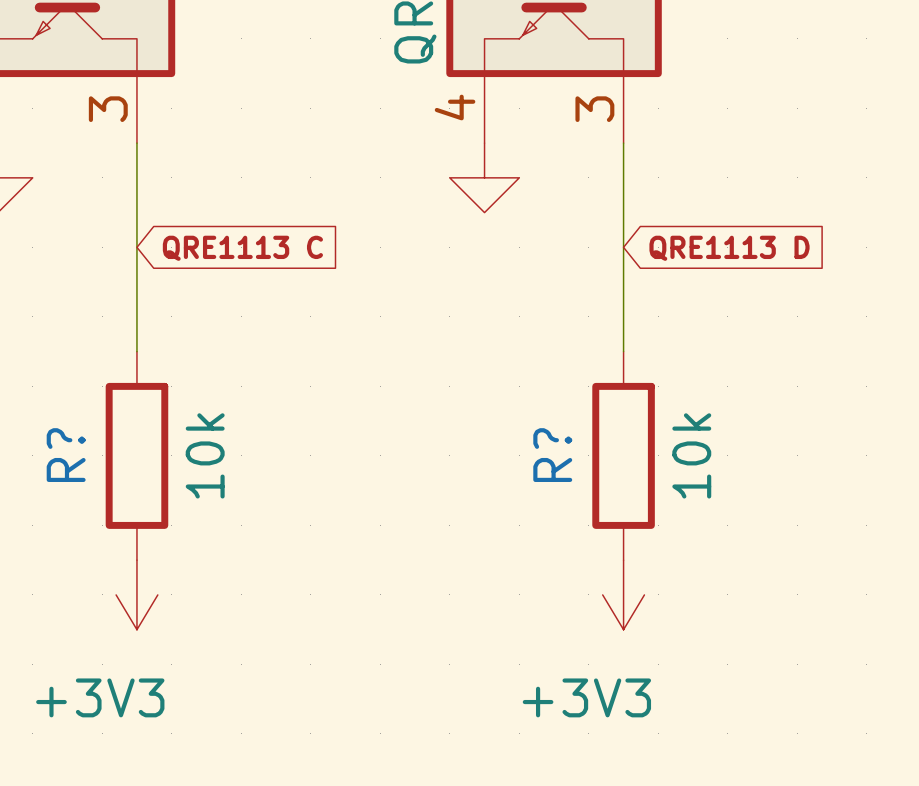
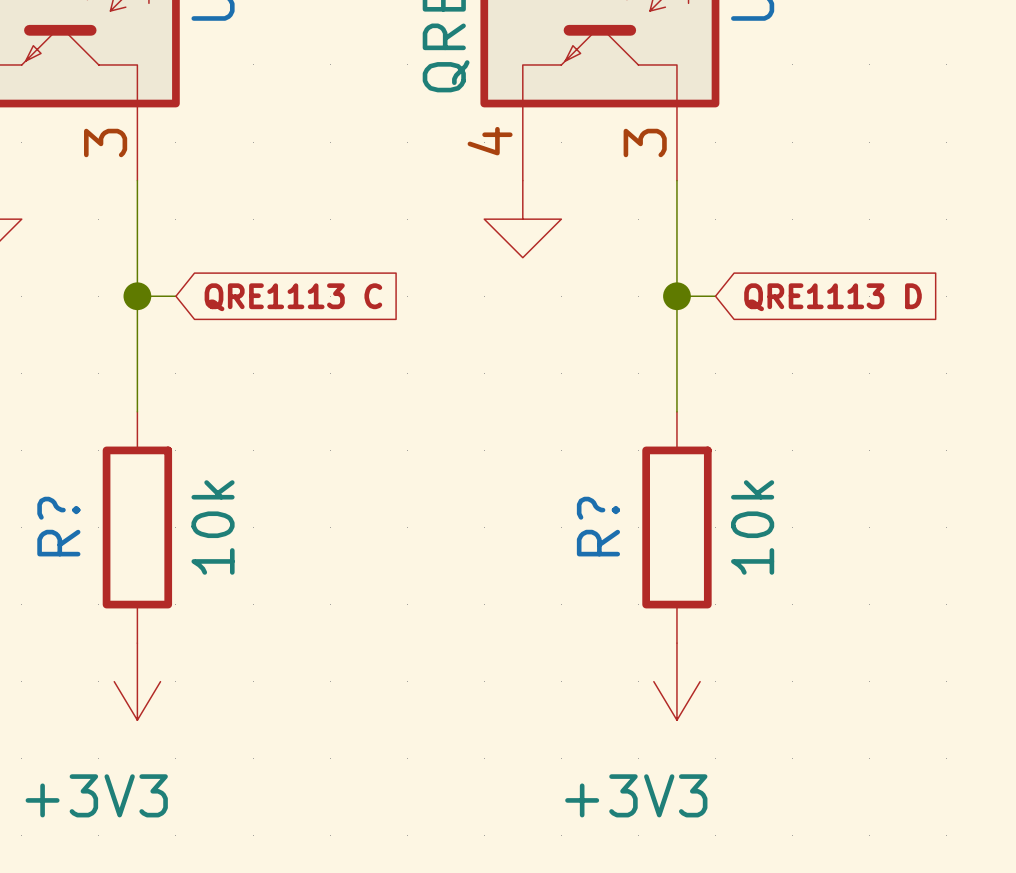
wire: none -> (137, 296) (175, 296)
junction: none -> (137, 296)
wire: none -> (676, 296) (715, 296)
junction: none -> (676, 296)
global label position: QRE1113 C (242, 248) -> QRE1113 C (293, 297)
global label position: QRE1113 D (729, 248) -> QRE1113 D (832, 297)

